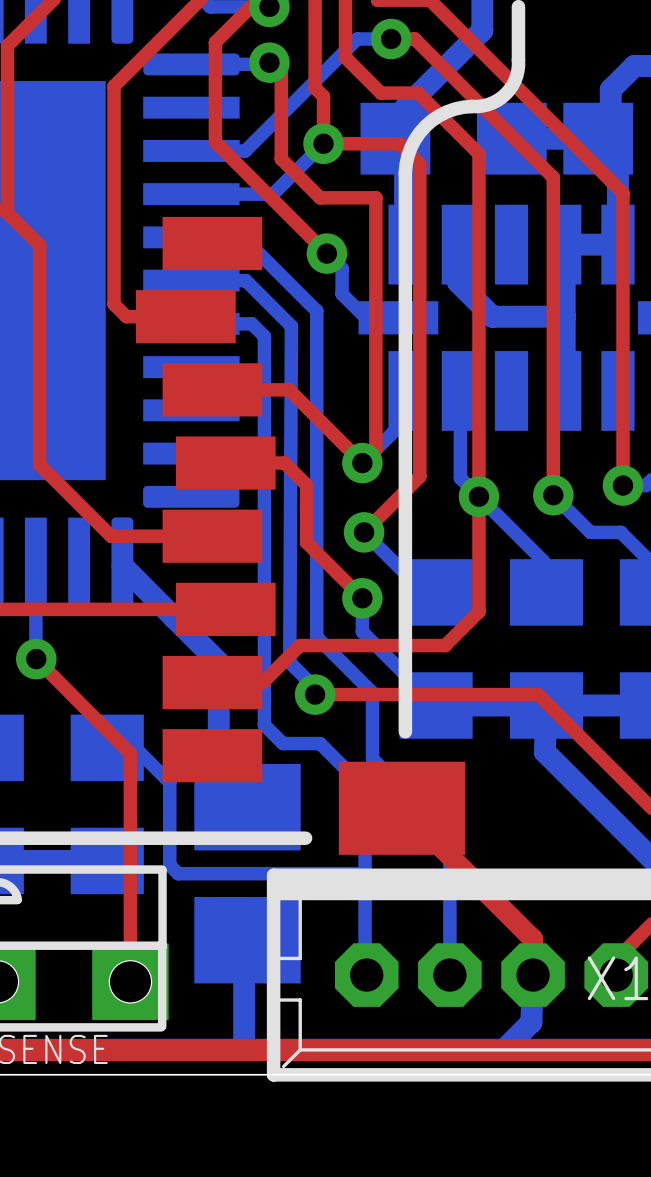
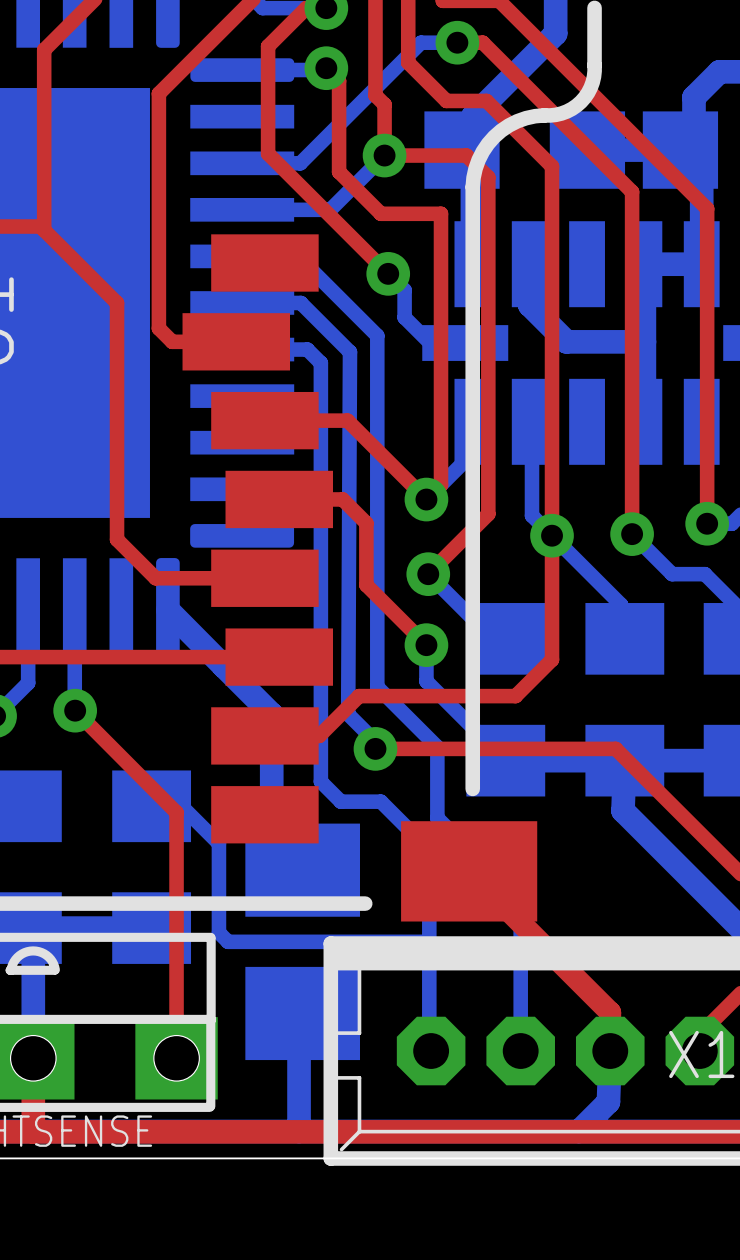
top track: (39, 245) (39, 464) (75, 500) -> (78, 264) (117, 303) (117, 539)

